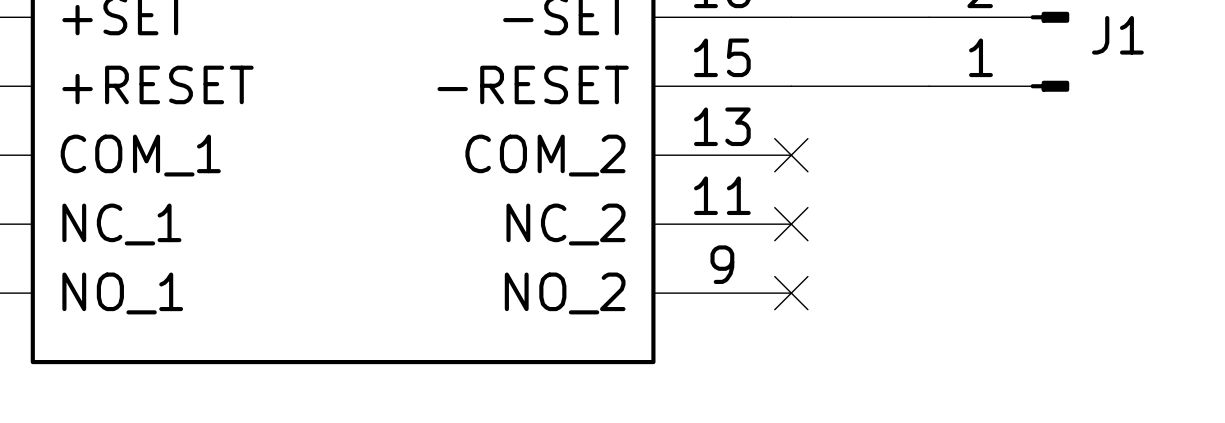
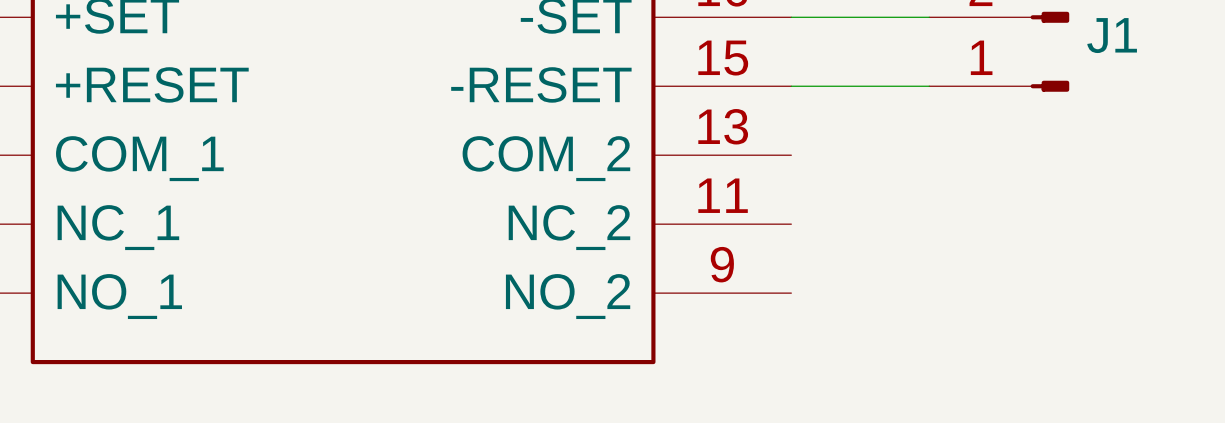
no-connect mark: (791, 155) -> none
no-connect mark: (791, 224) -> none
no-connect mark: (791, 293) -> none

